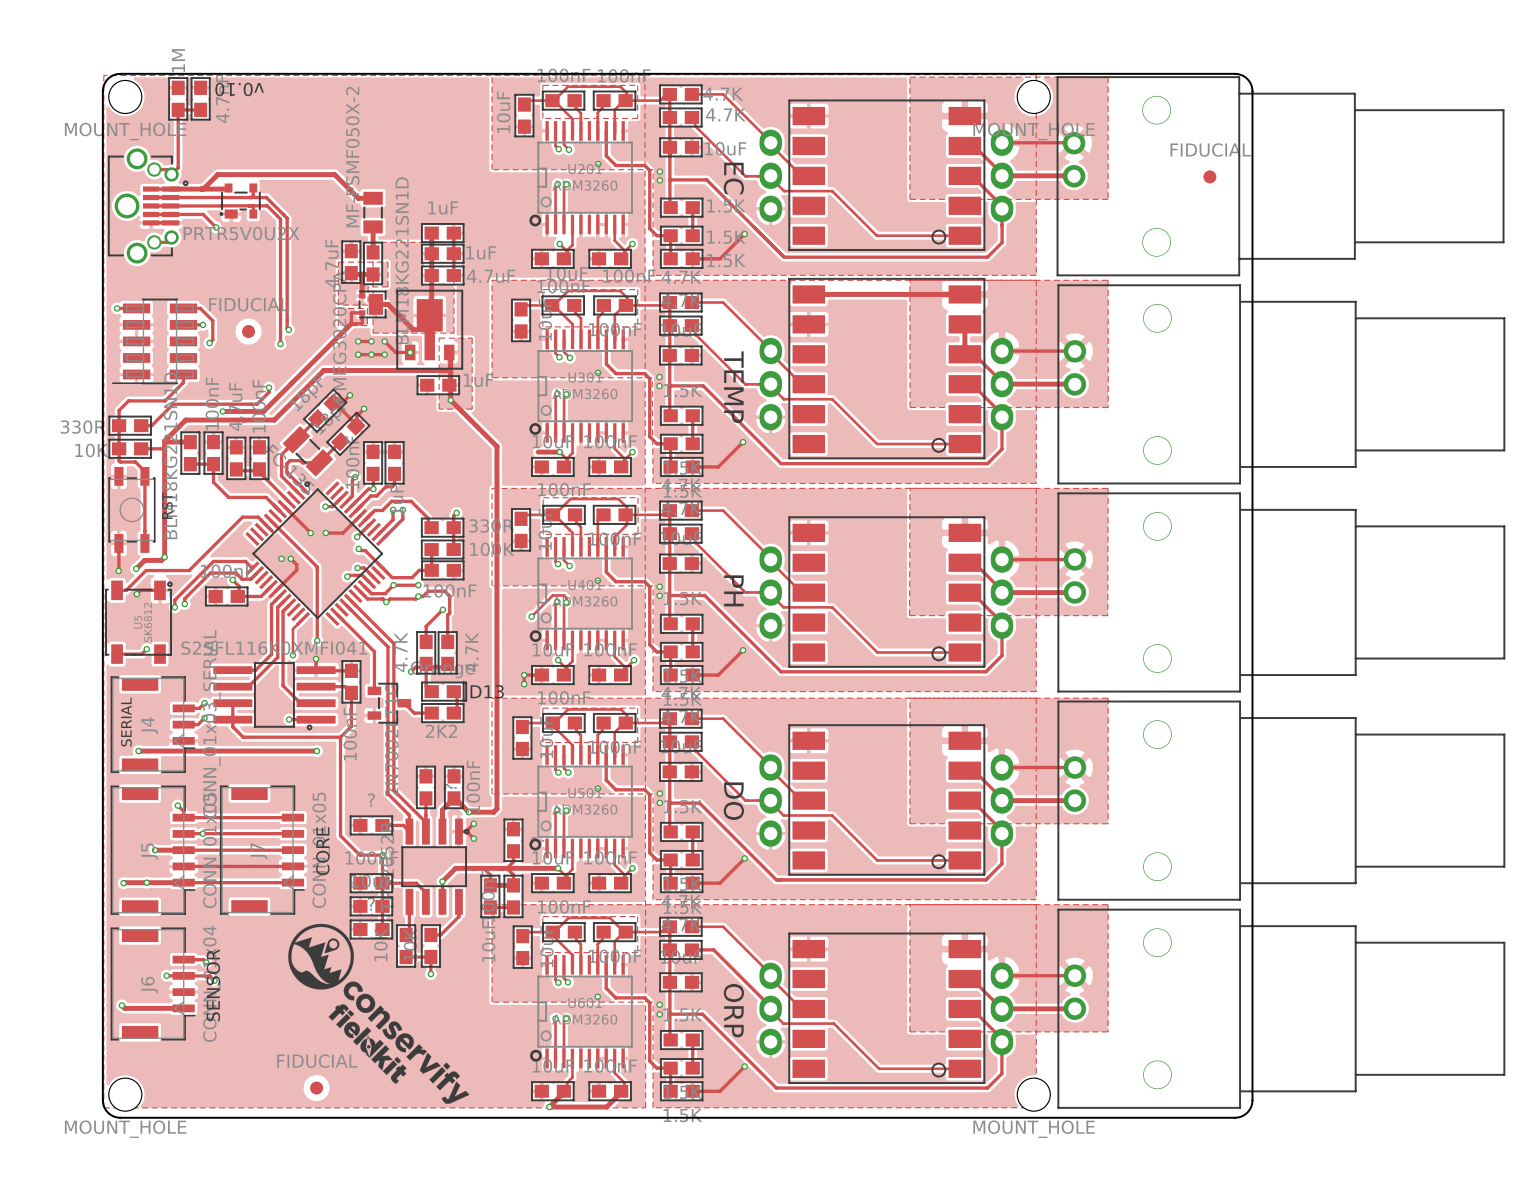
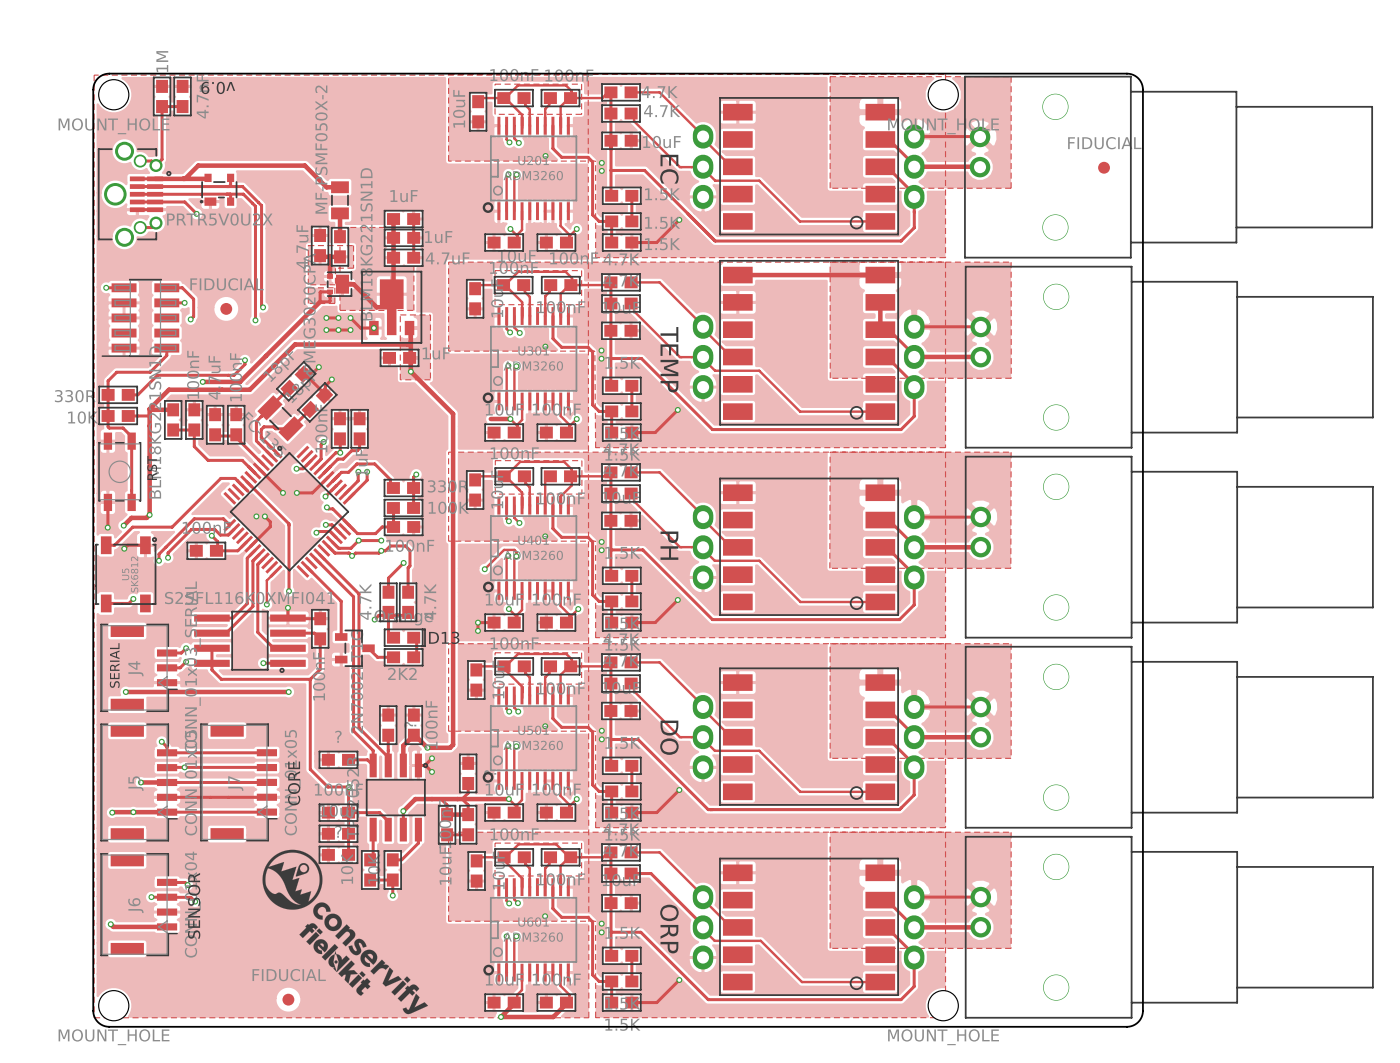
text: v0.10 (239, 89) -> v0.9 (218, 87)

